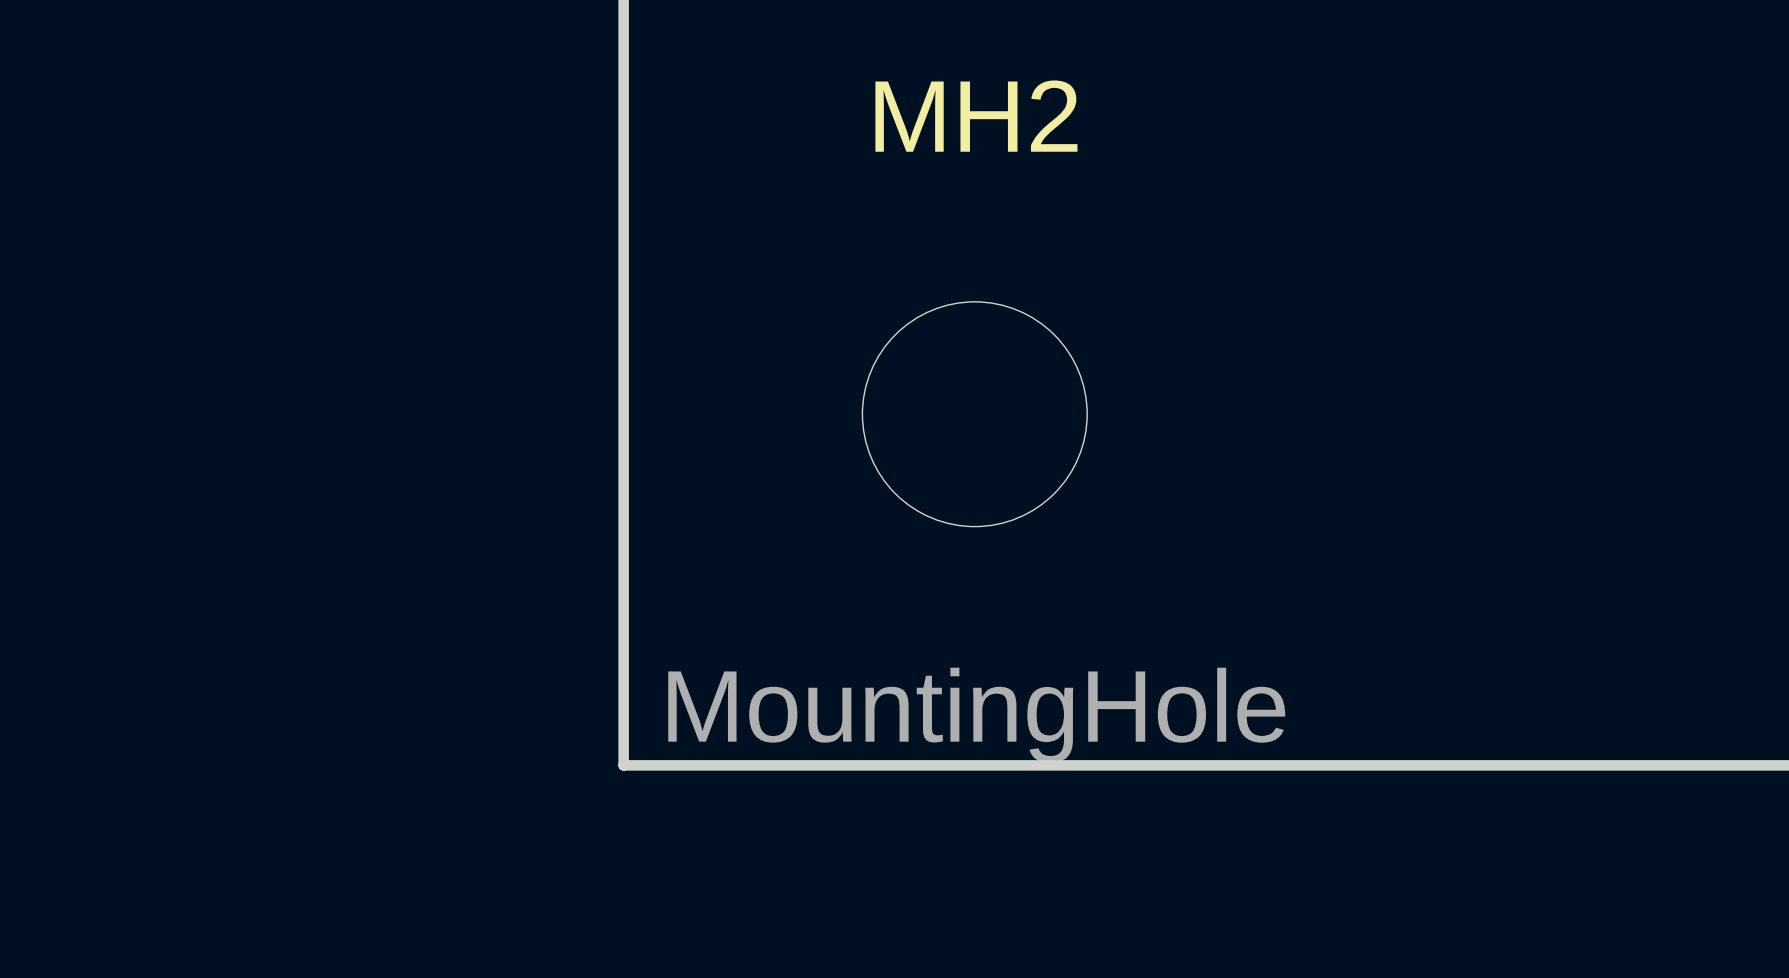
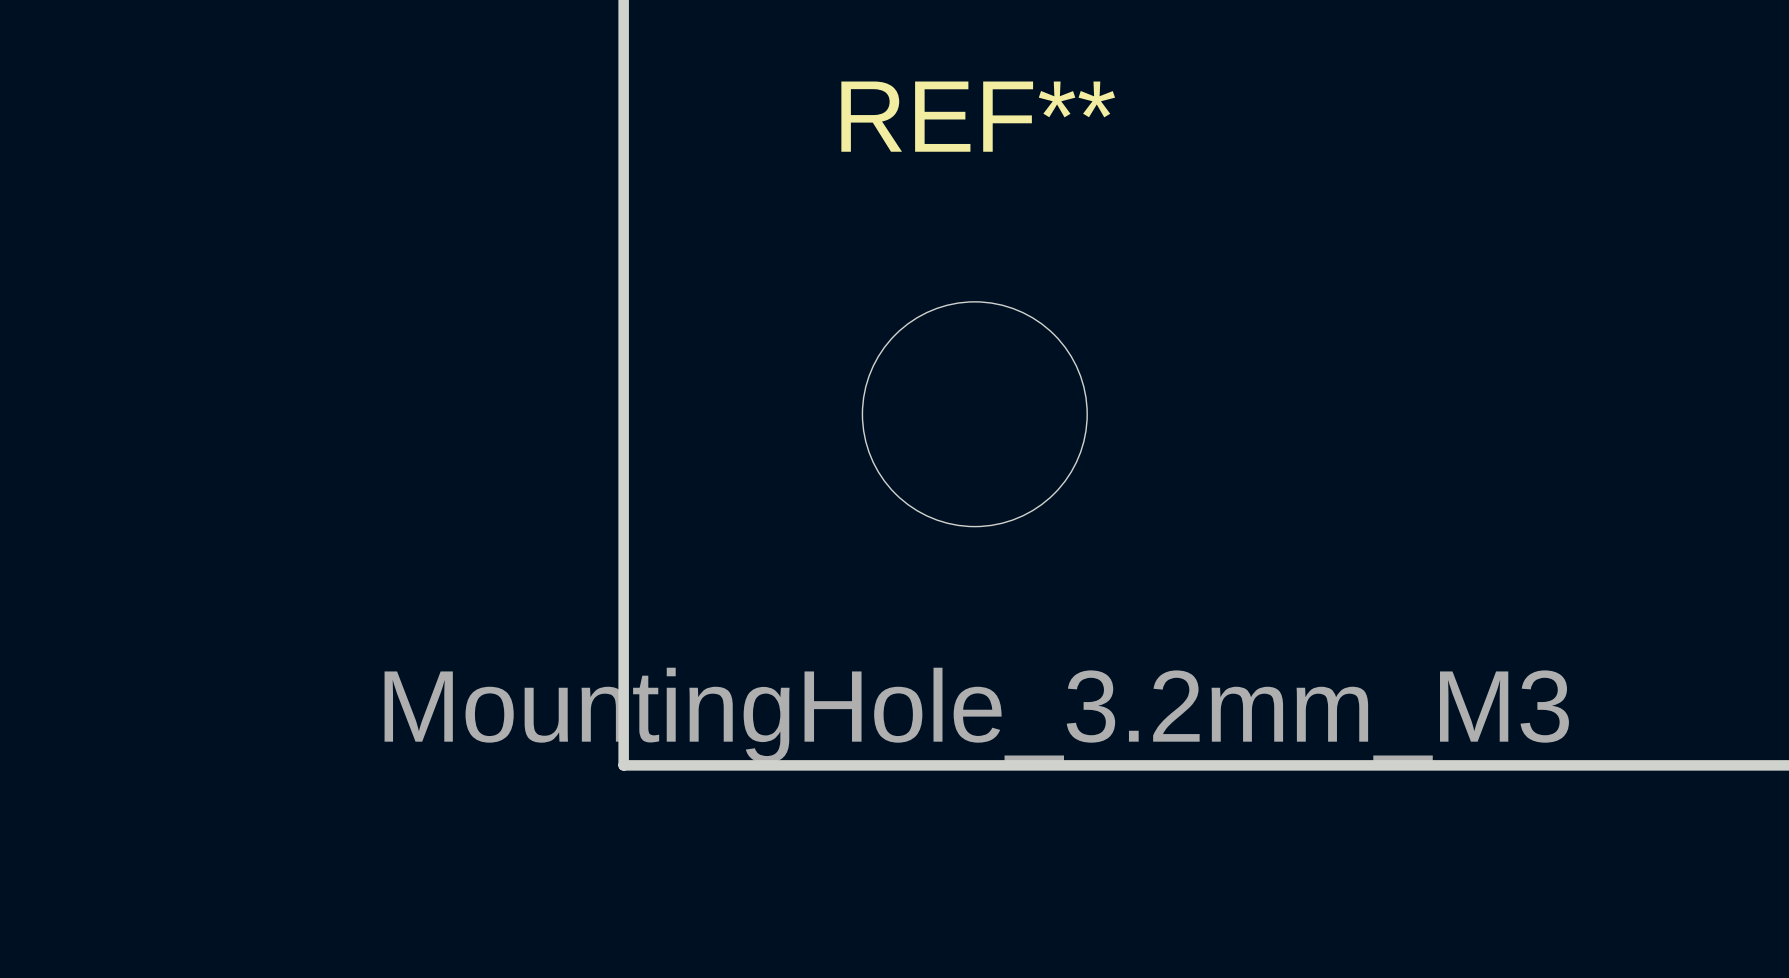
MH2 name: MH2 (976, 116) -> REF** (978, 116)
MH2 value: MountingHole (976, 715) -> MountingHole_3.2mm_M3 (976, 715)

